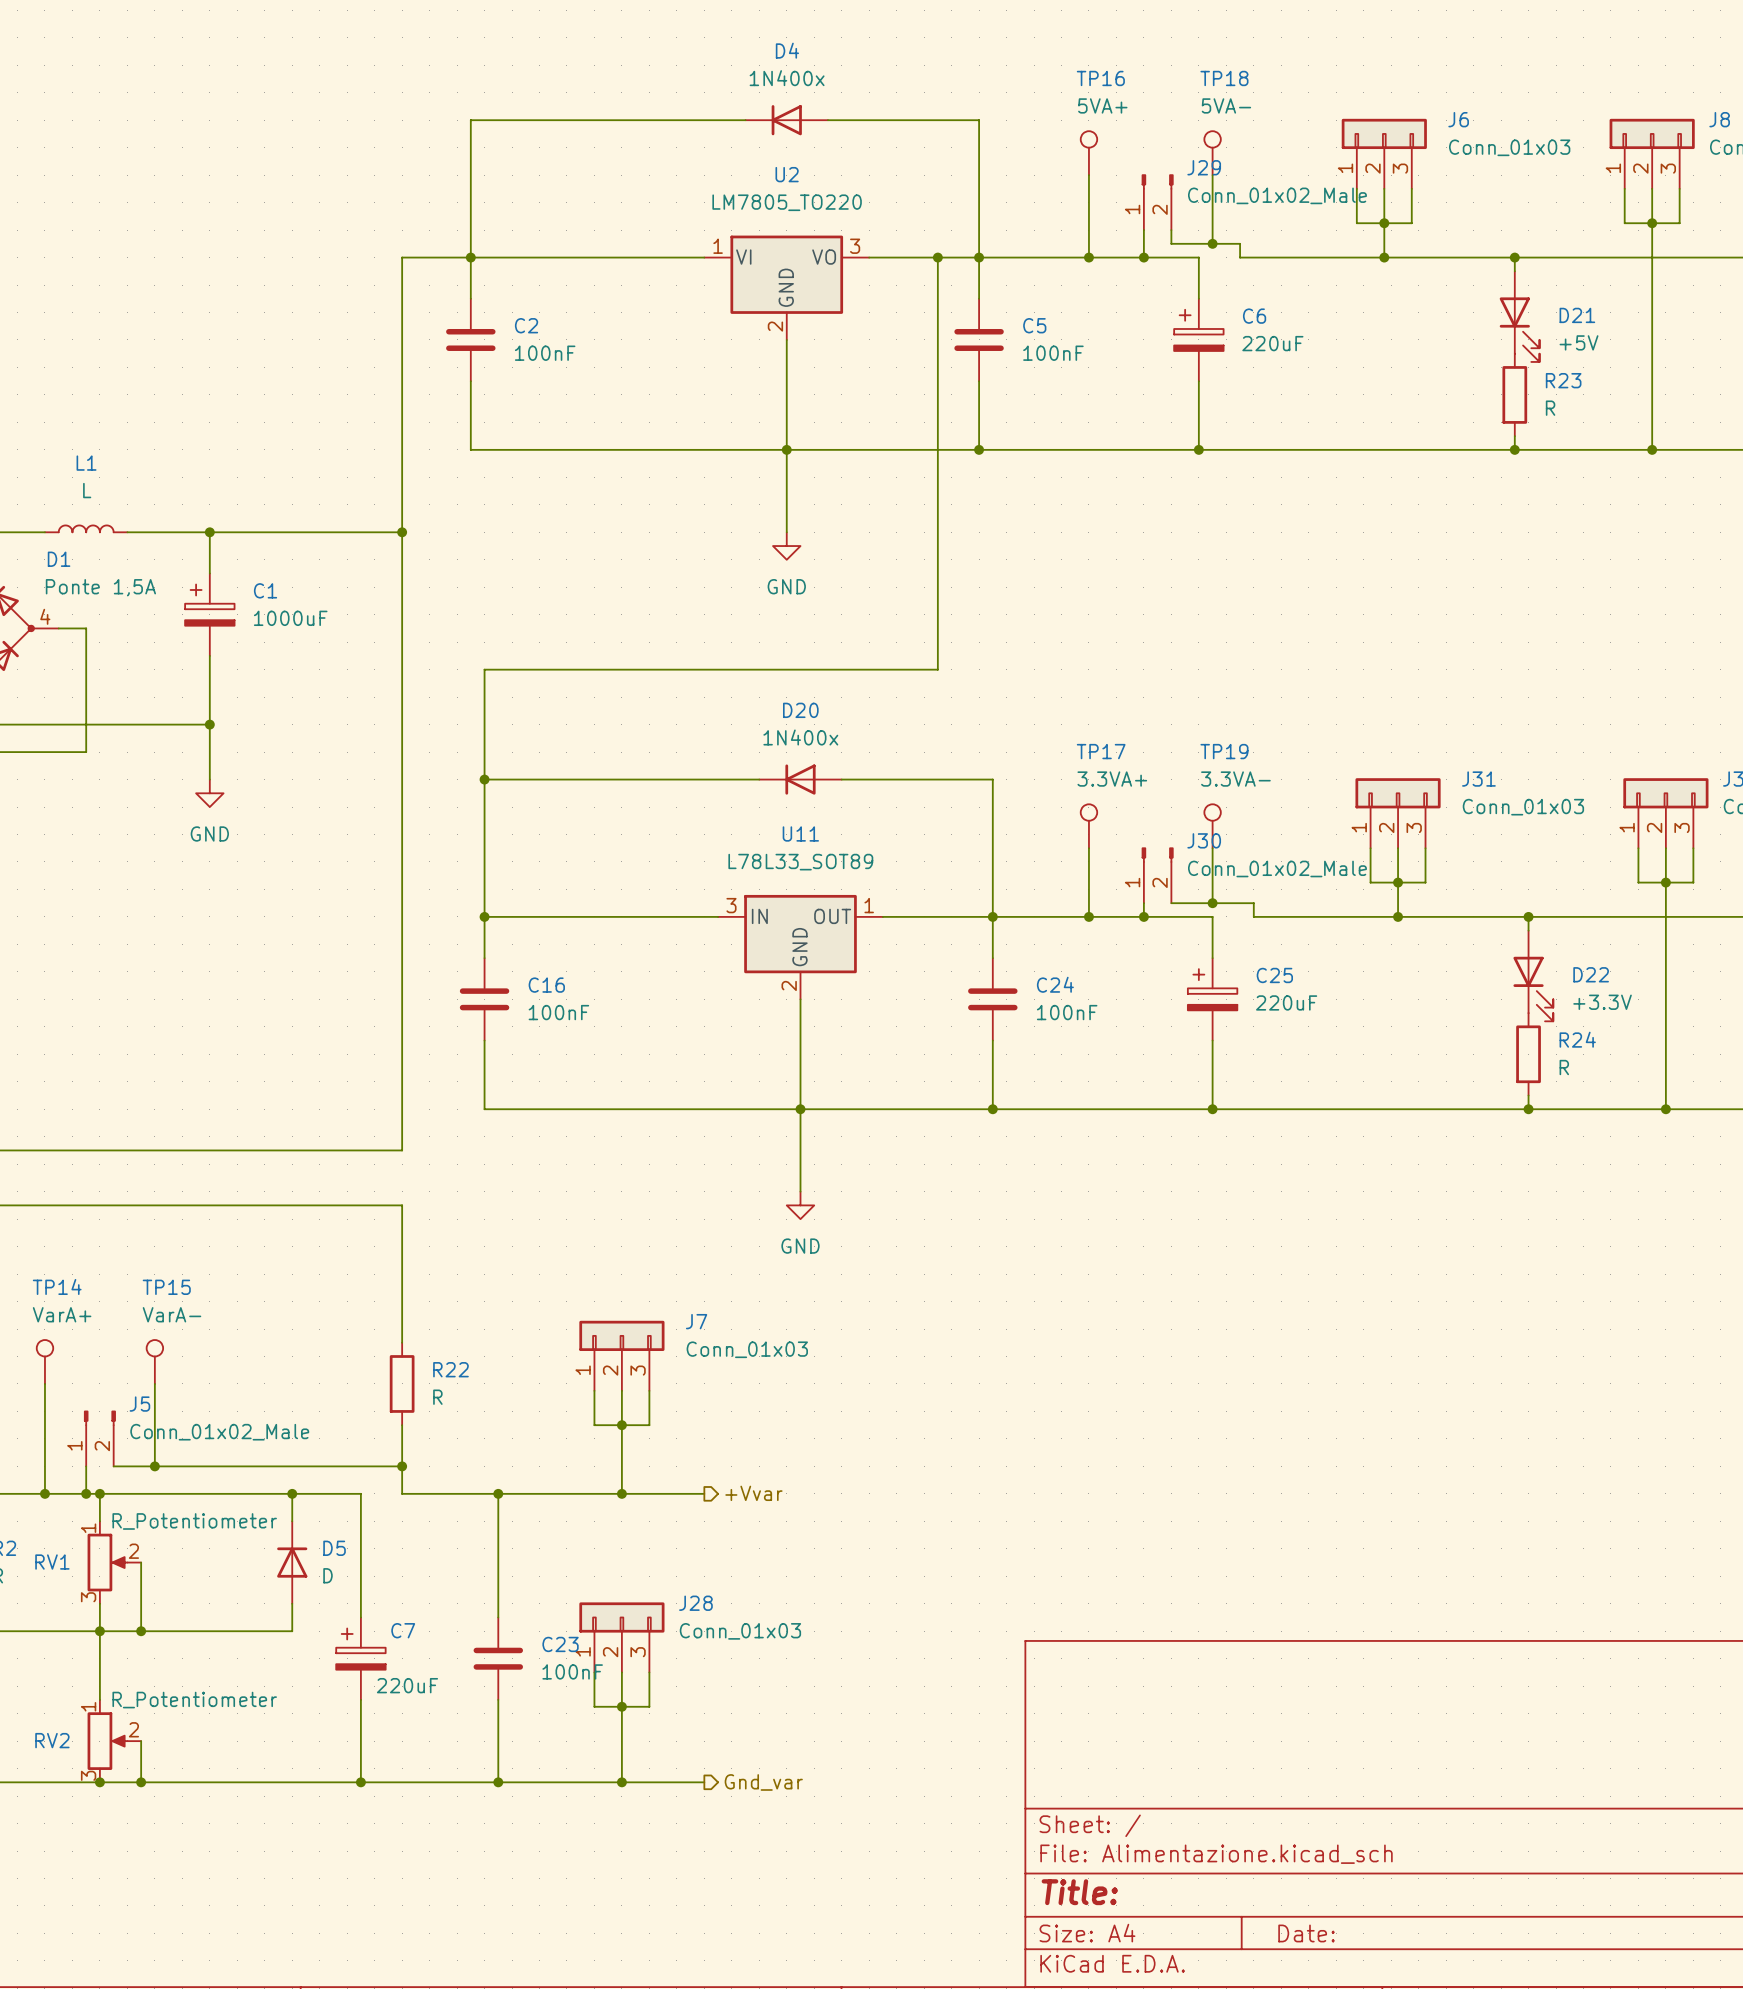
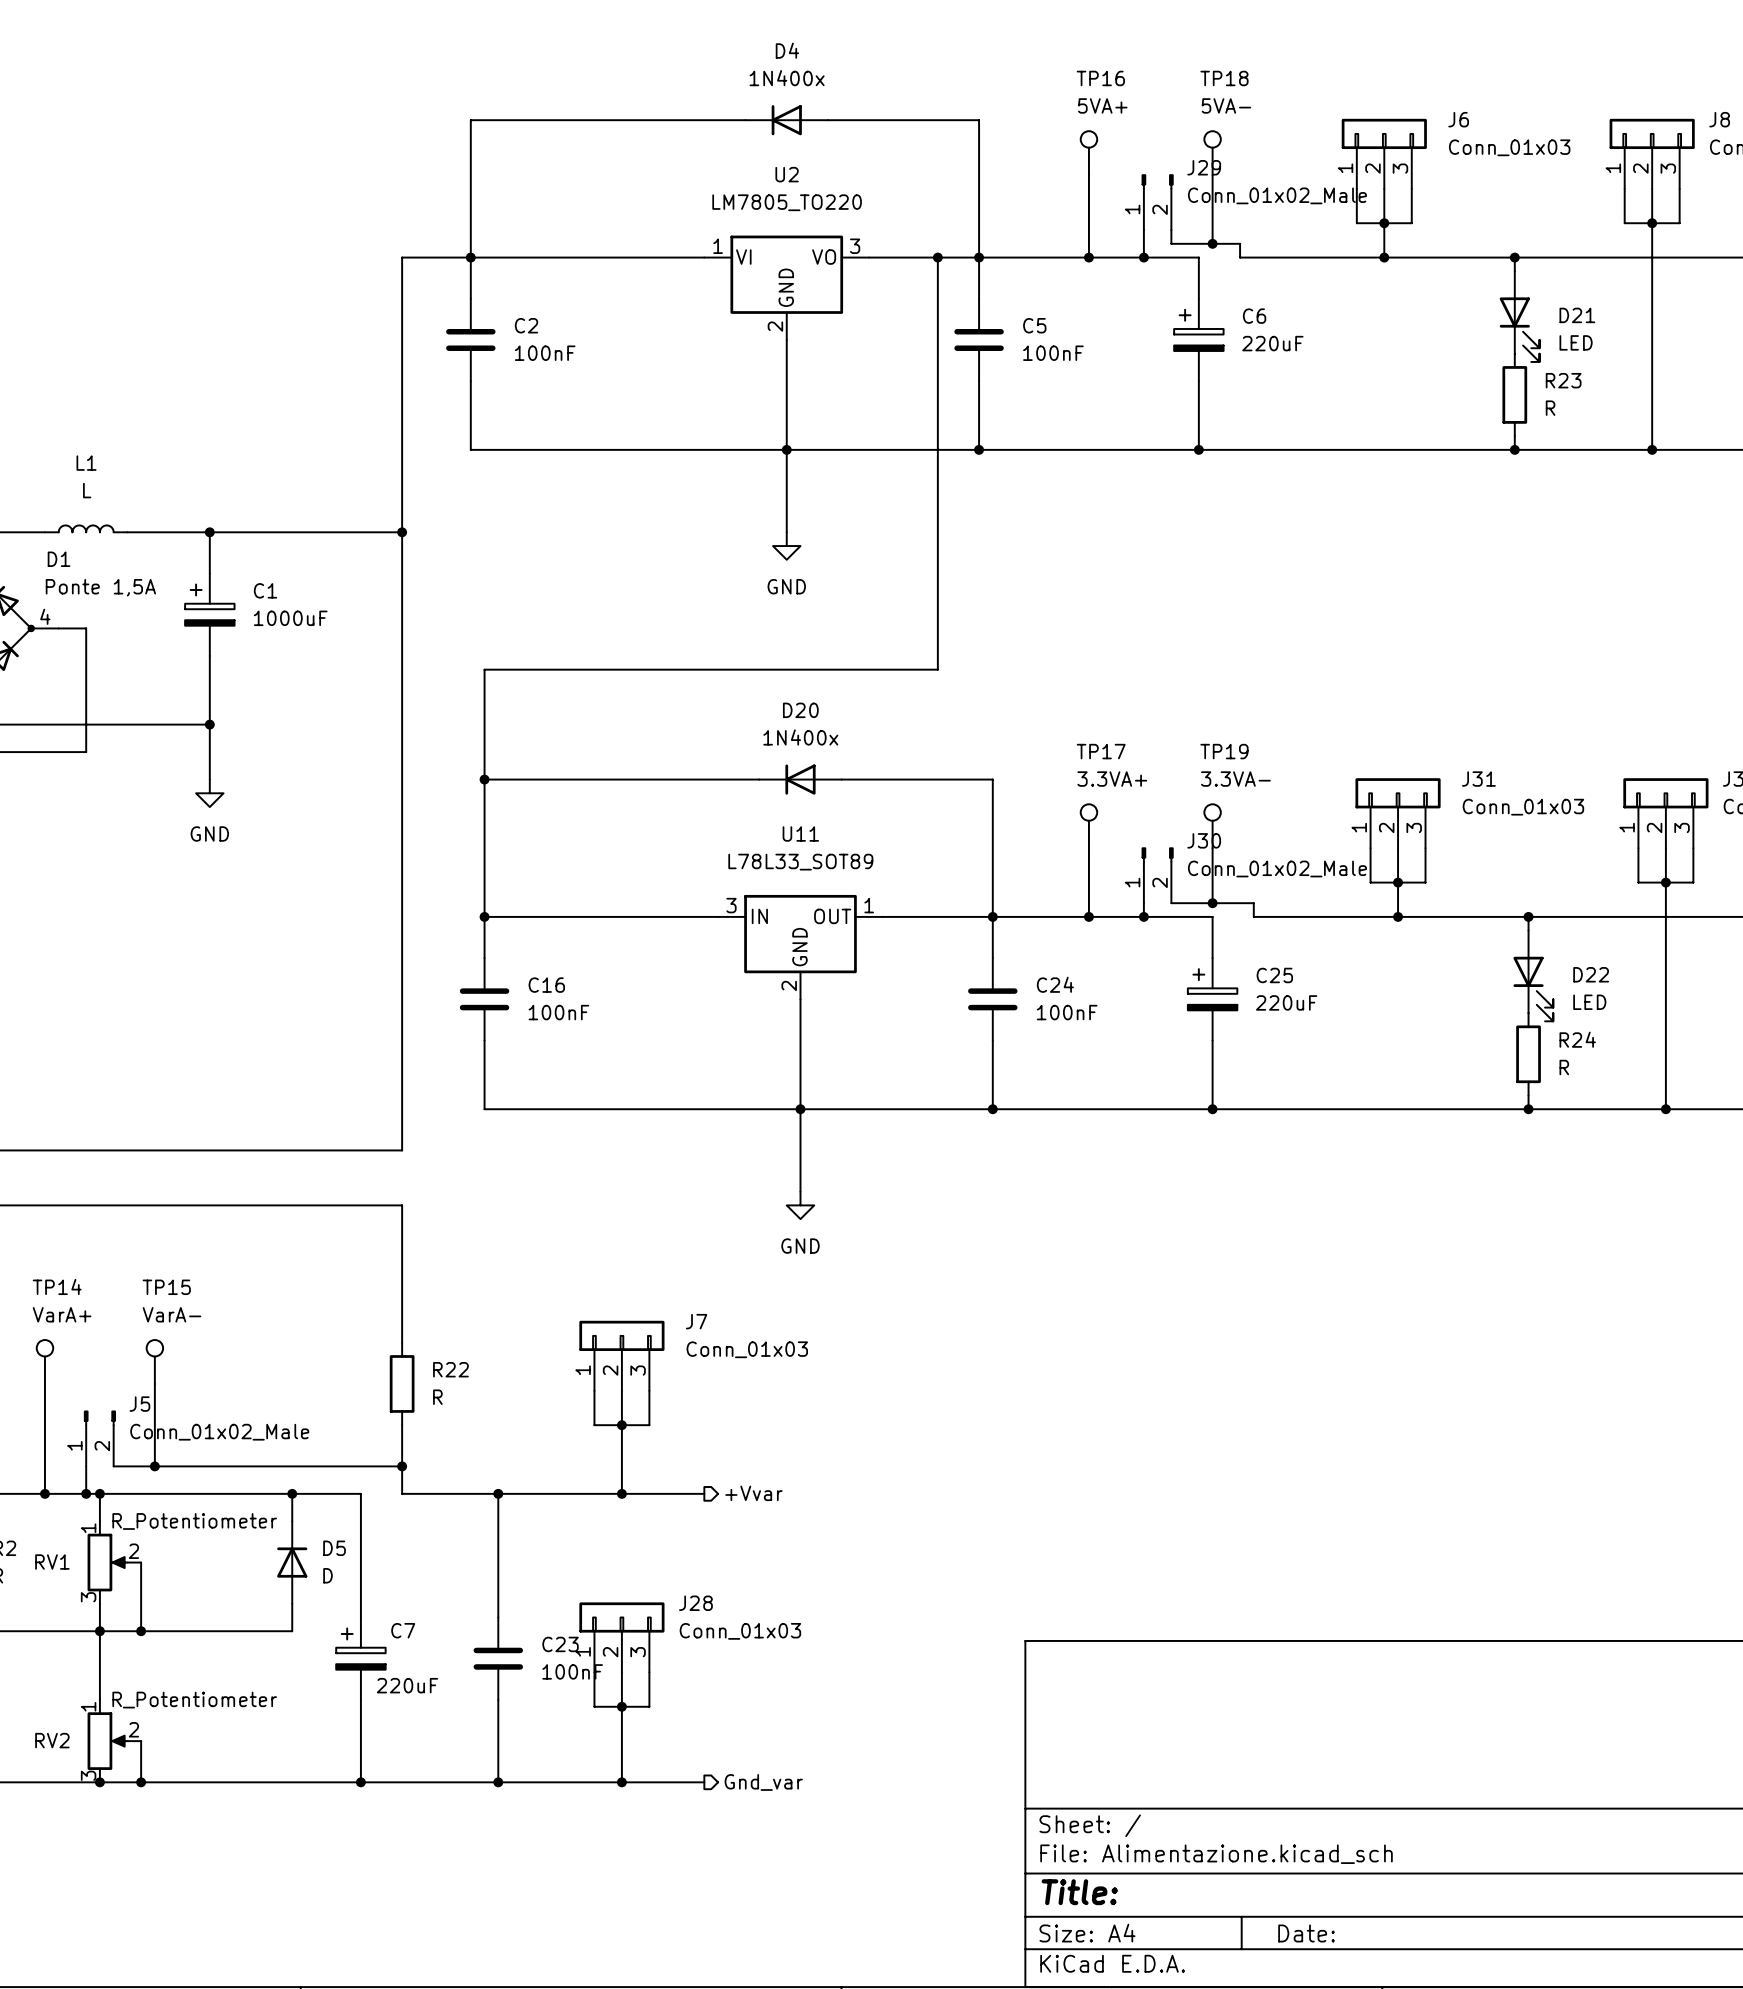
D21 value: +5V (1579, 342) -> LED (1576, 342)
D22 value: +3.3V (1602, 1002) -> LED (1589, 1002)

